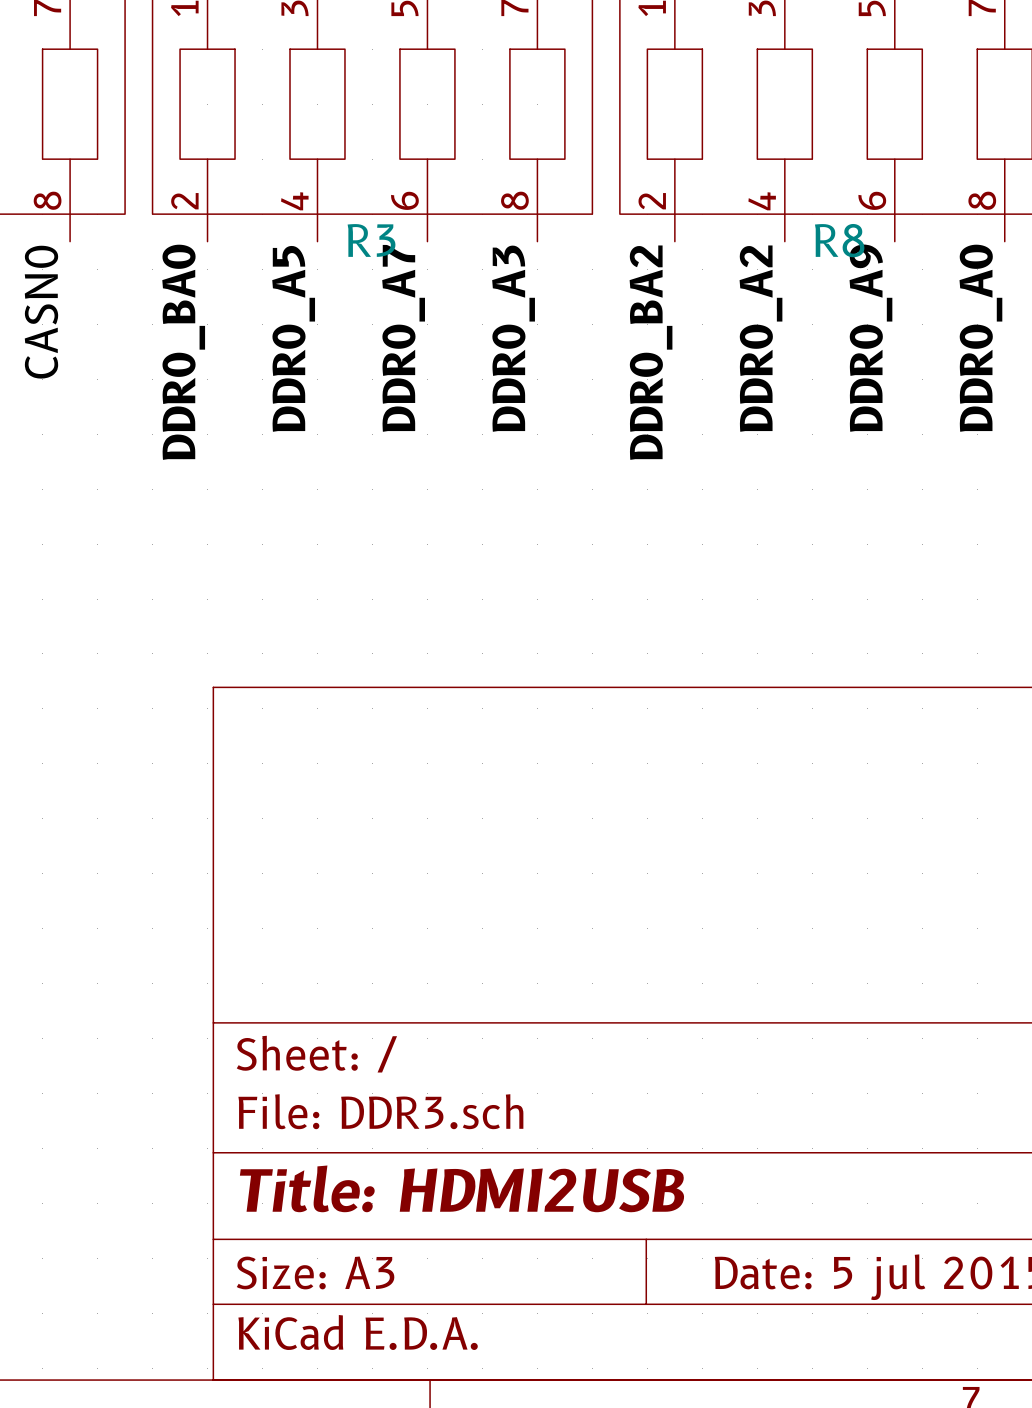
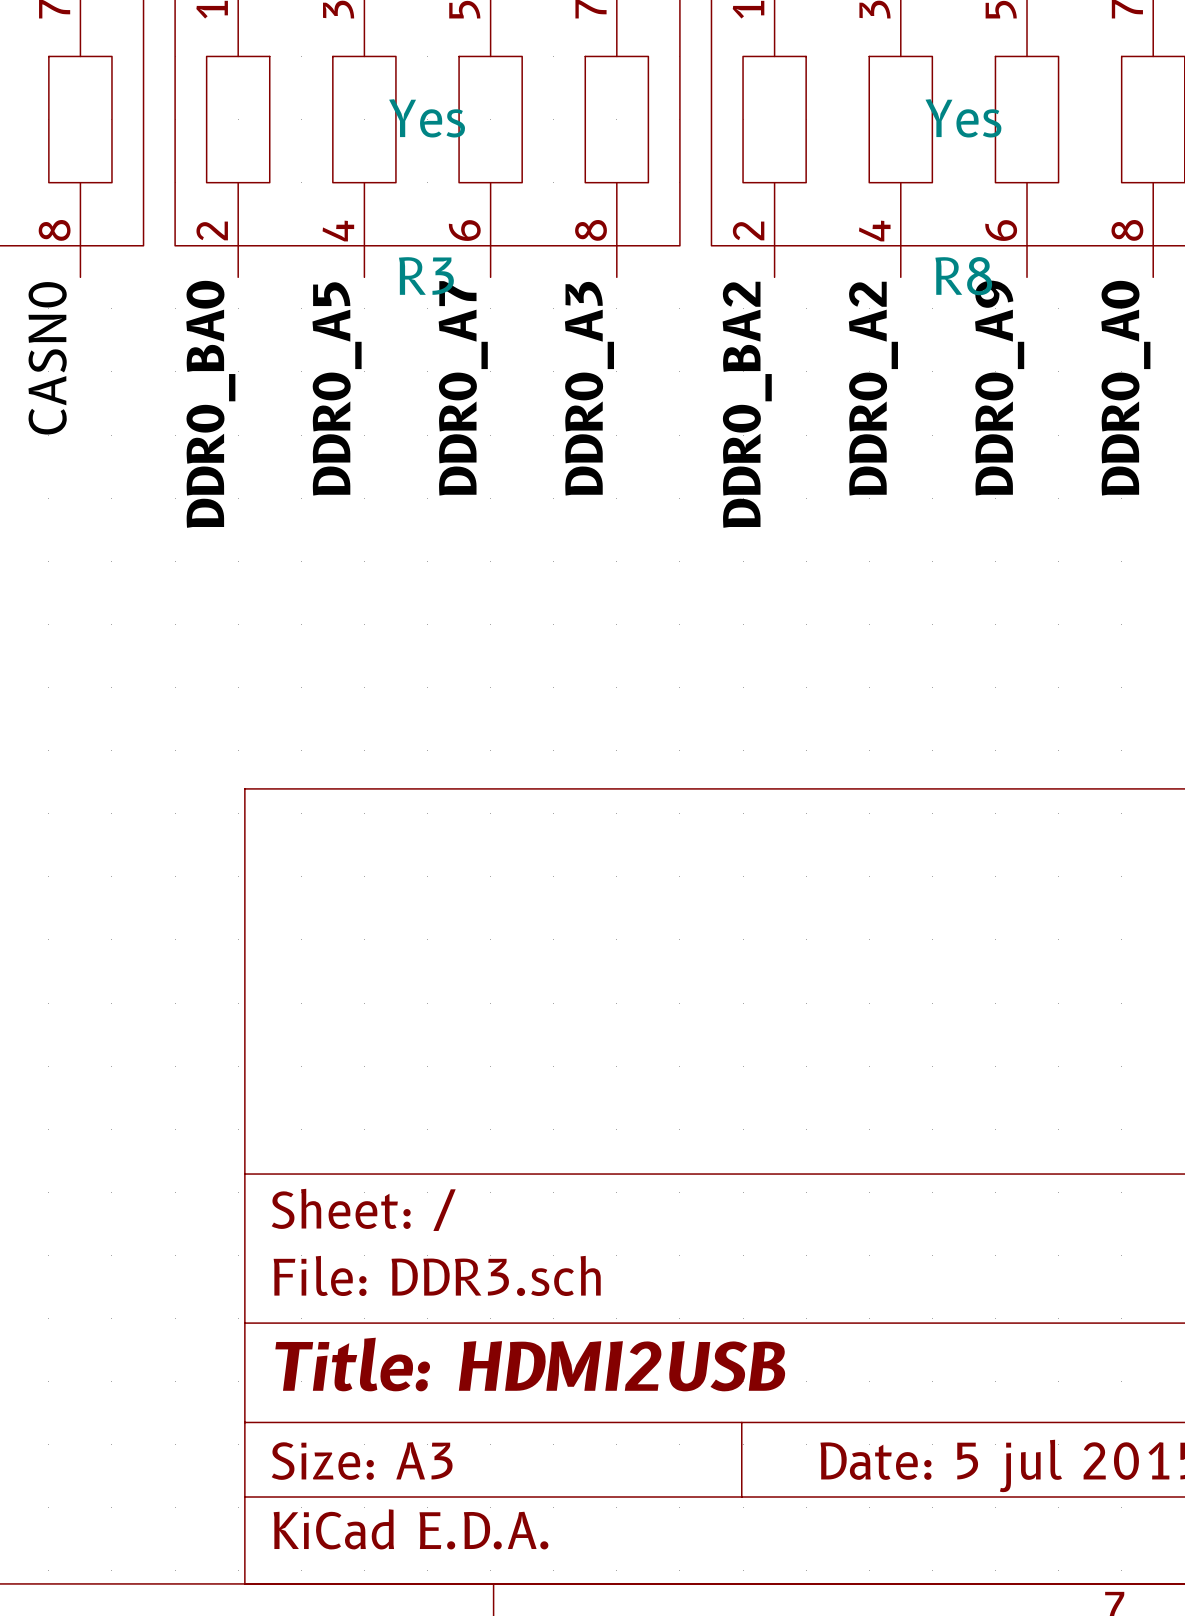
R3 text: none -> Yes (427, 118)
R8 text: none -> Yes (963, 118)

